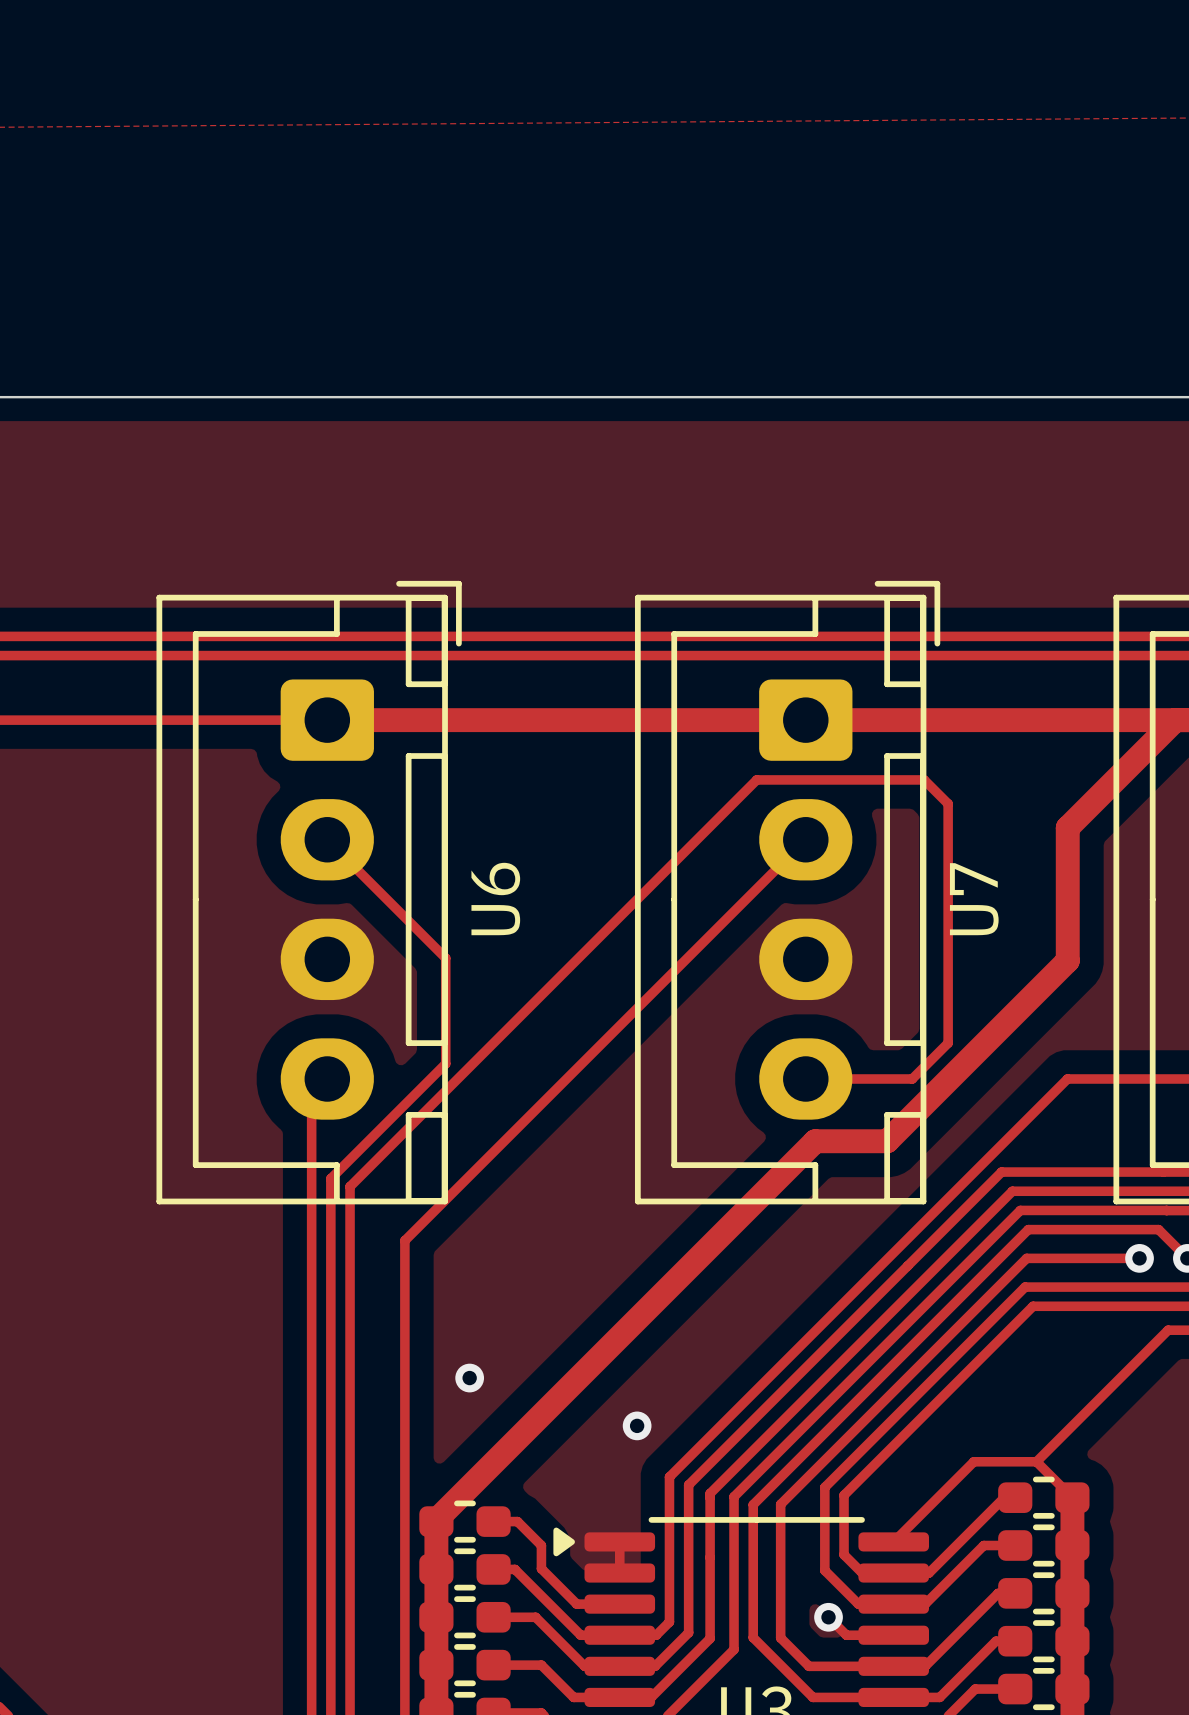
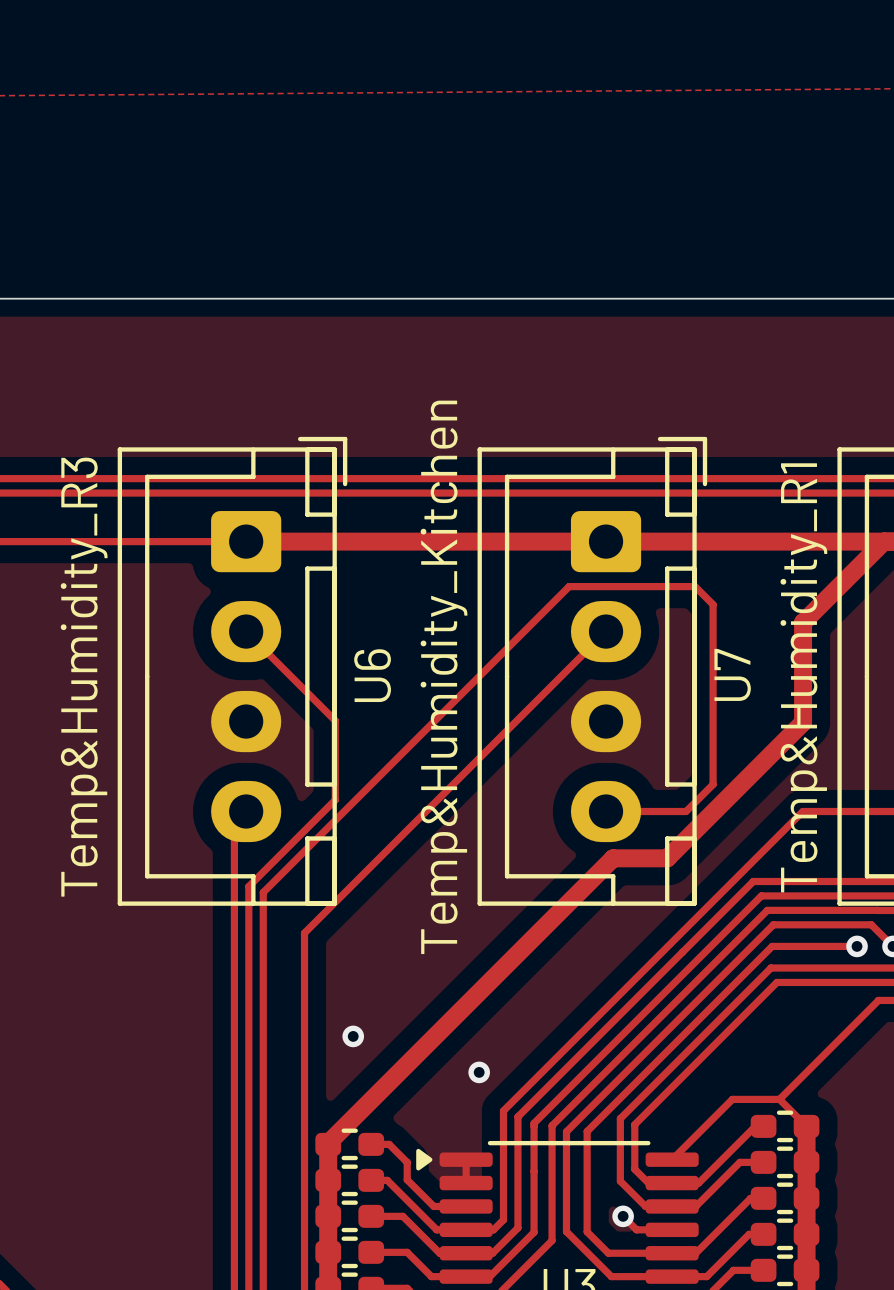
part value: none -> Temp&Humidity_R1 (803, 677)
U6 value: none -> Temp&Humidity_R3 (84, 677)
U7 value: none -> Temp&Humidity_Kitchen (444, 677)

